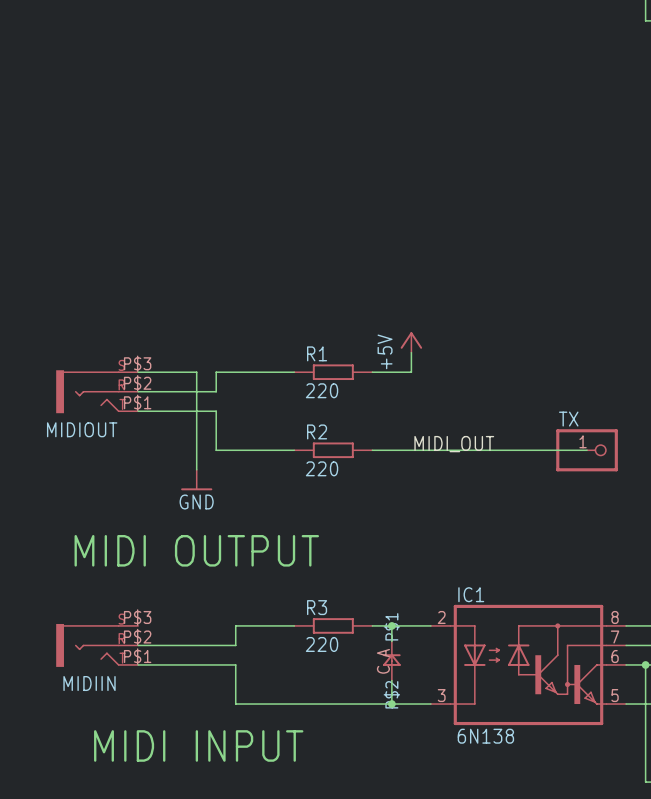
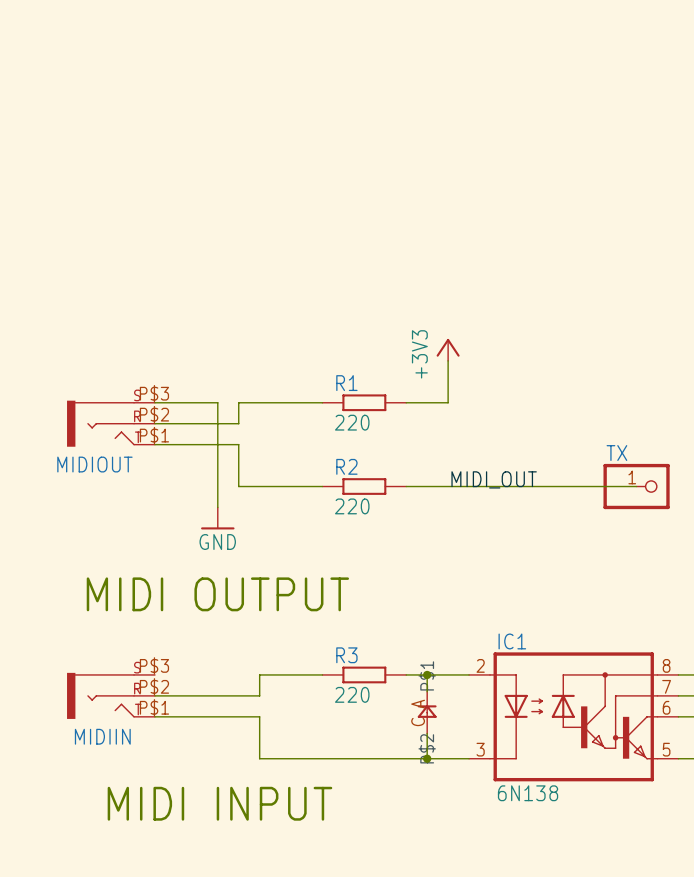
power symbol: none -> +3V3 (448, 349)
power symbol: +5V (411, 342) -> none

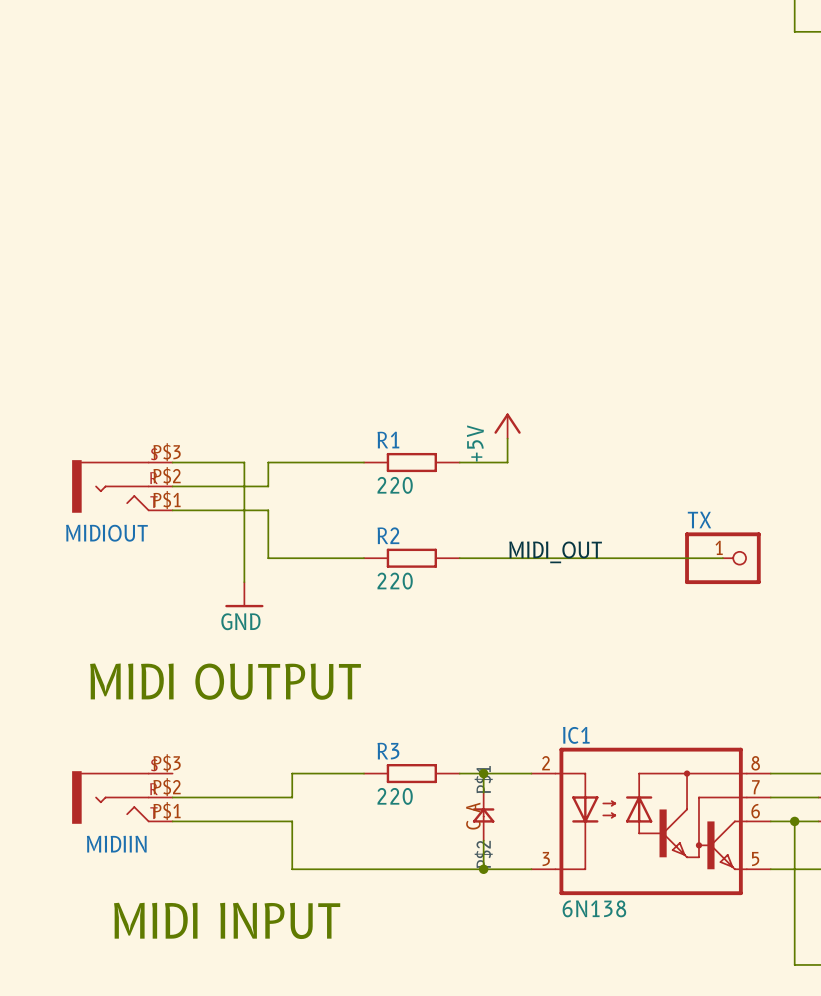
power symbol: +3V3 (448, 349) -> none
power symbol: none -> +5V (507, 426)

